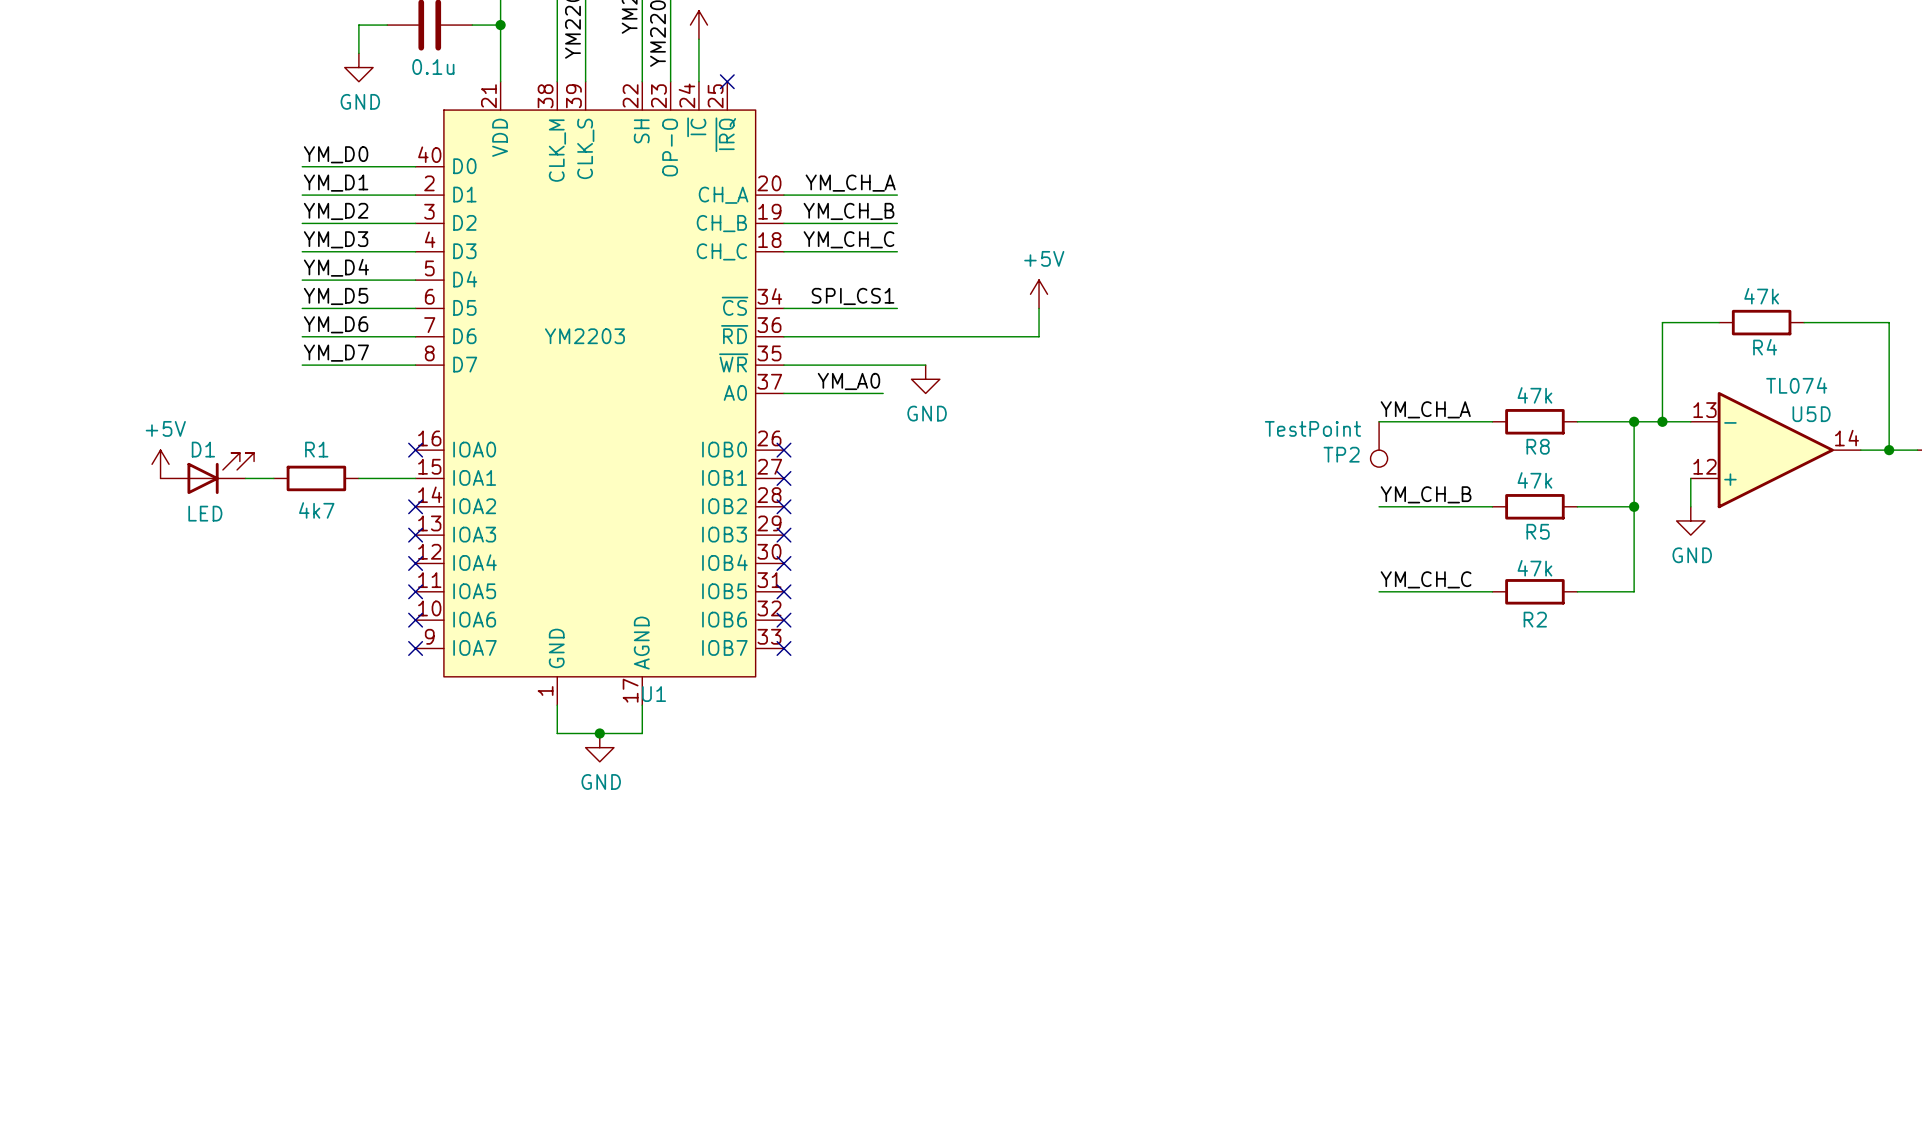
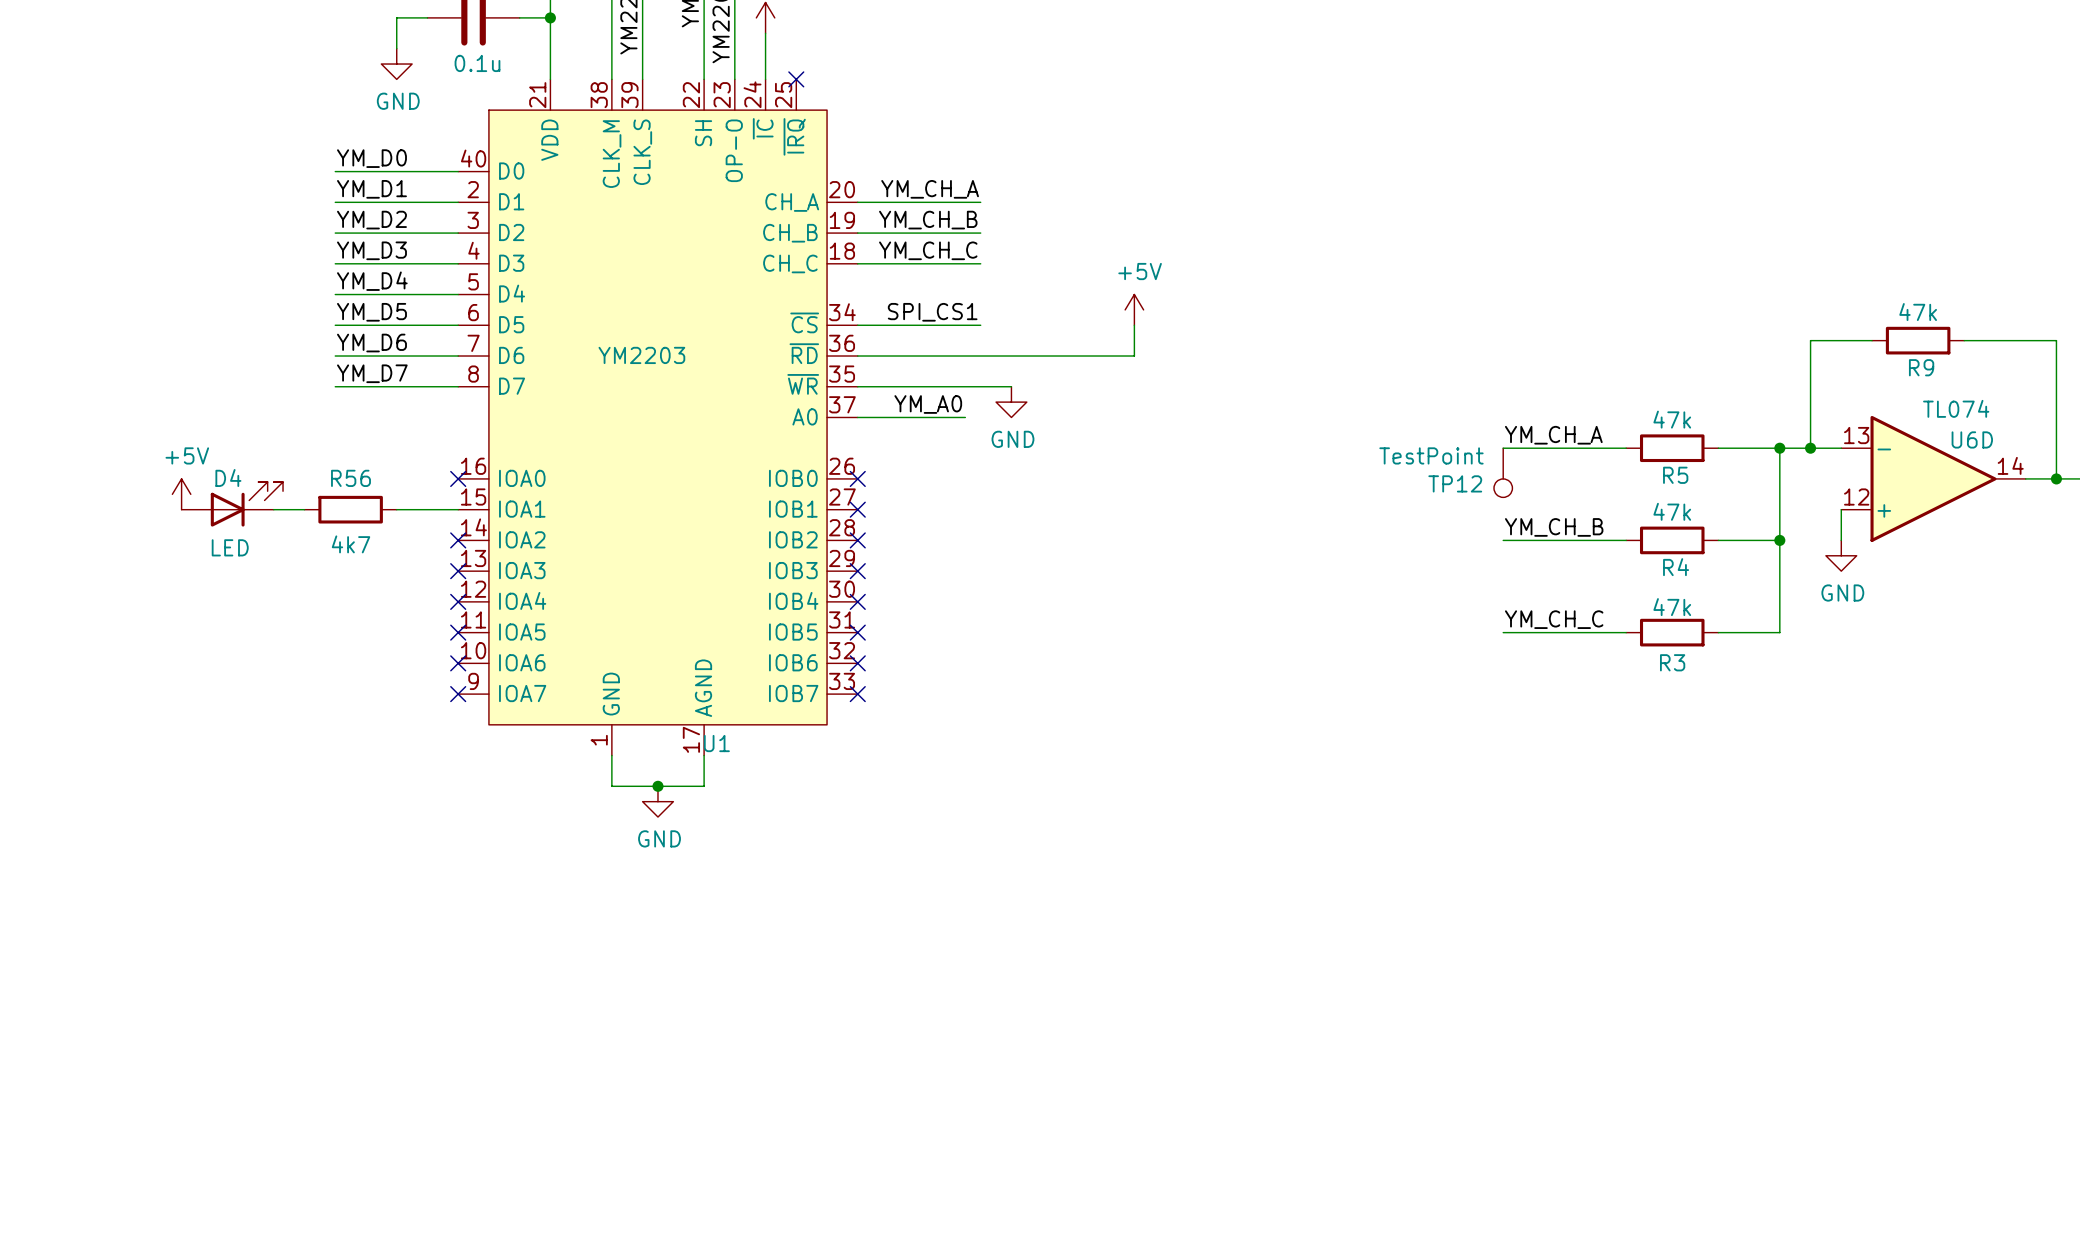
R4 name: R4 (1765, 347) -> R9 (1921, 367)
U5D name: U5D (1811, 414) -> U6D (1972, 439)
R8 name: R8 (1538, 446) -> R5 (1675, 475)
D1 name: D1 (203, 449) -> D4 (228, 478)
R1 name: R1 (316, 449) -> R56 (351, 478)
TP2 name: TP2 (1341, 454) -> TP12 (1455, 483)
R5 name: R5 (1538, 531) -> R4 (1676, 567)
R2 name: R2 (1535, 619) -> R3 (1672, 662)

